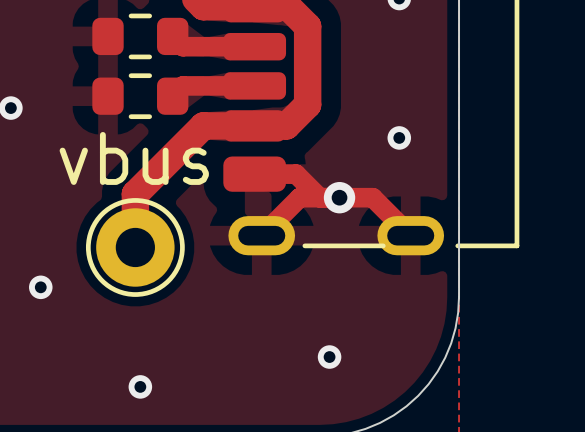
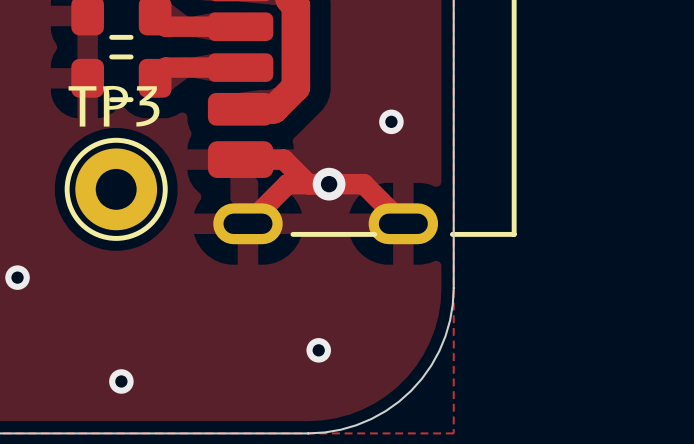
track: (254, 125) (203, 125) (135, 193) (135, 247) -> none
text: vbus (134, 158) -> none
TP3: none -> (116, 189)
part: (135, 247) -> none

